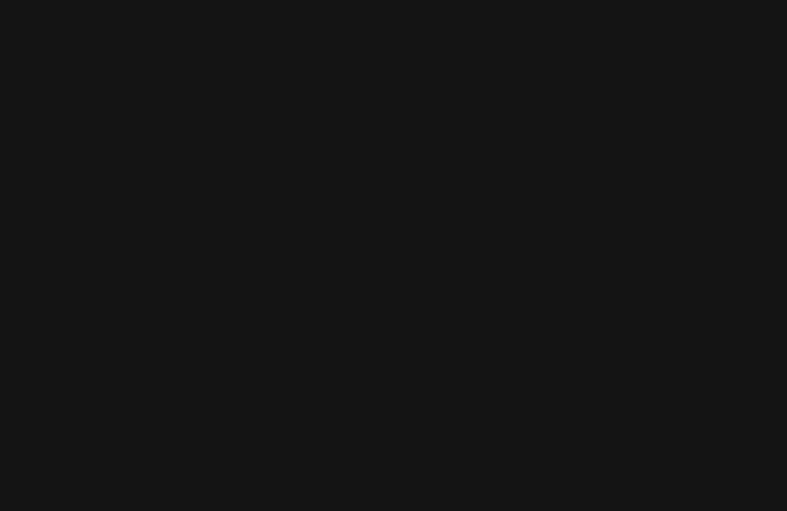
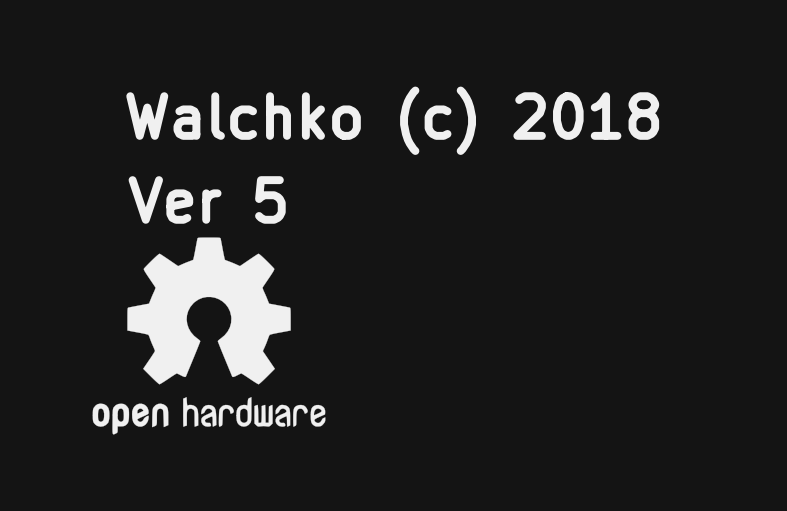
text: none -> Walchko (c) 2018 (392, 120)
text: none -> Ver 5 (207, 199)
drawing: none -> [92, 237, 326, 435]

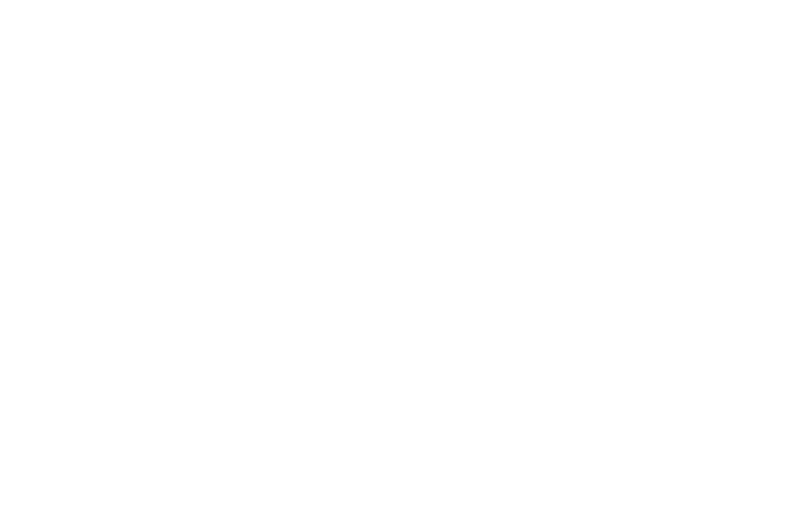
text: Walchko (c) 2018 (392, 120) -> none
text: Ver 5 (207, 199) -> none
drawing: [92, 237, 326, 435] -> none

